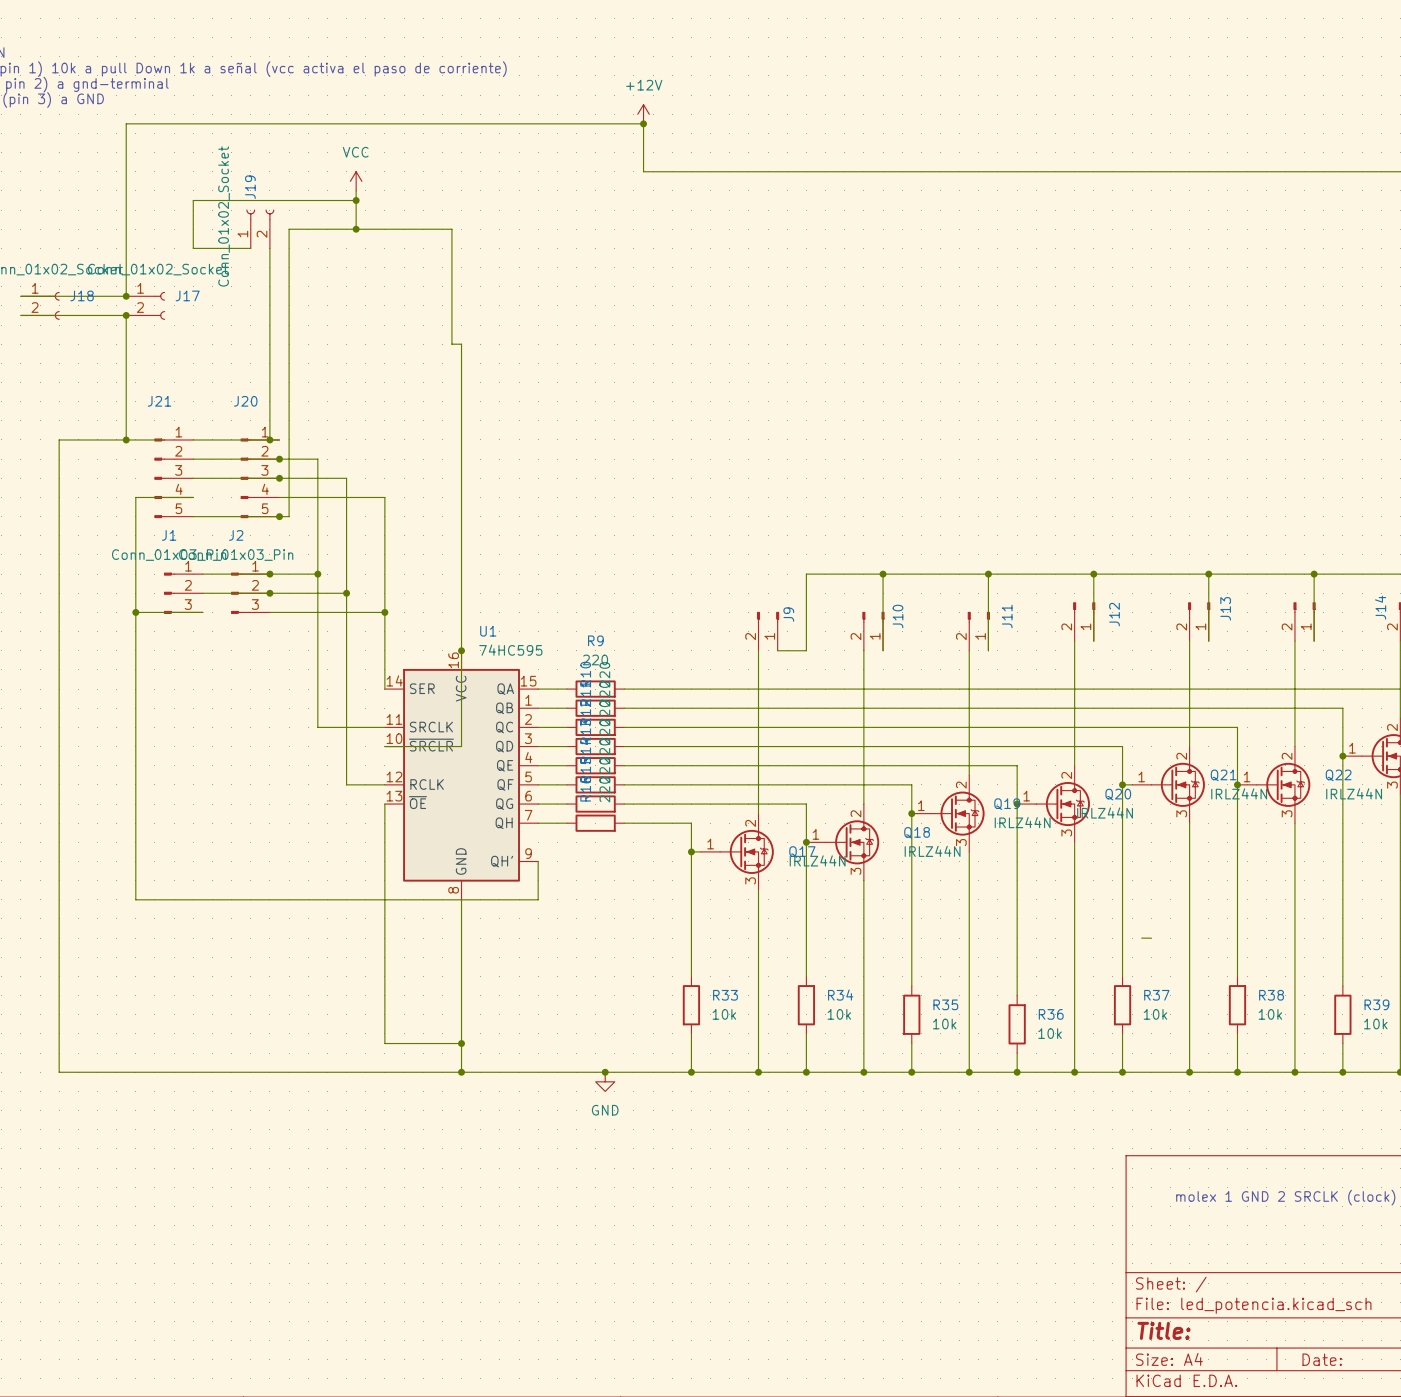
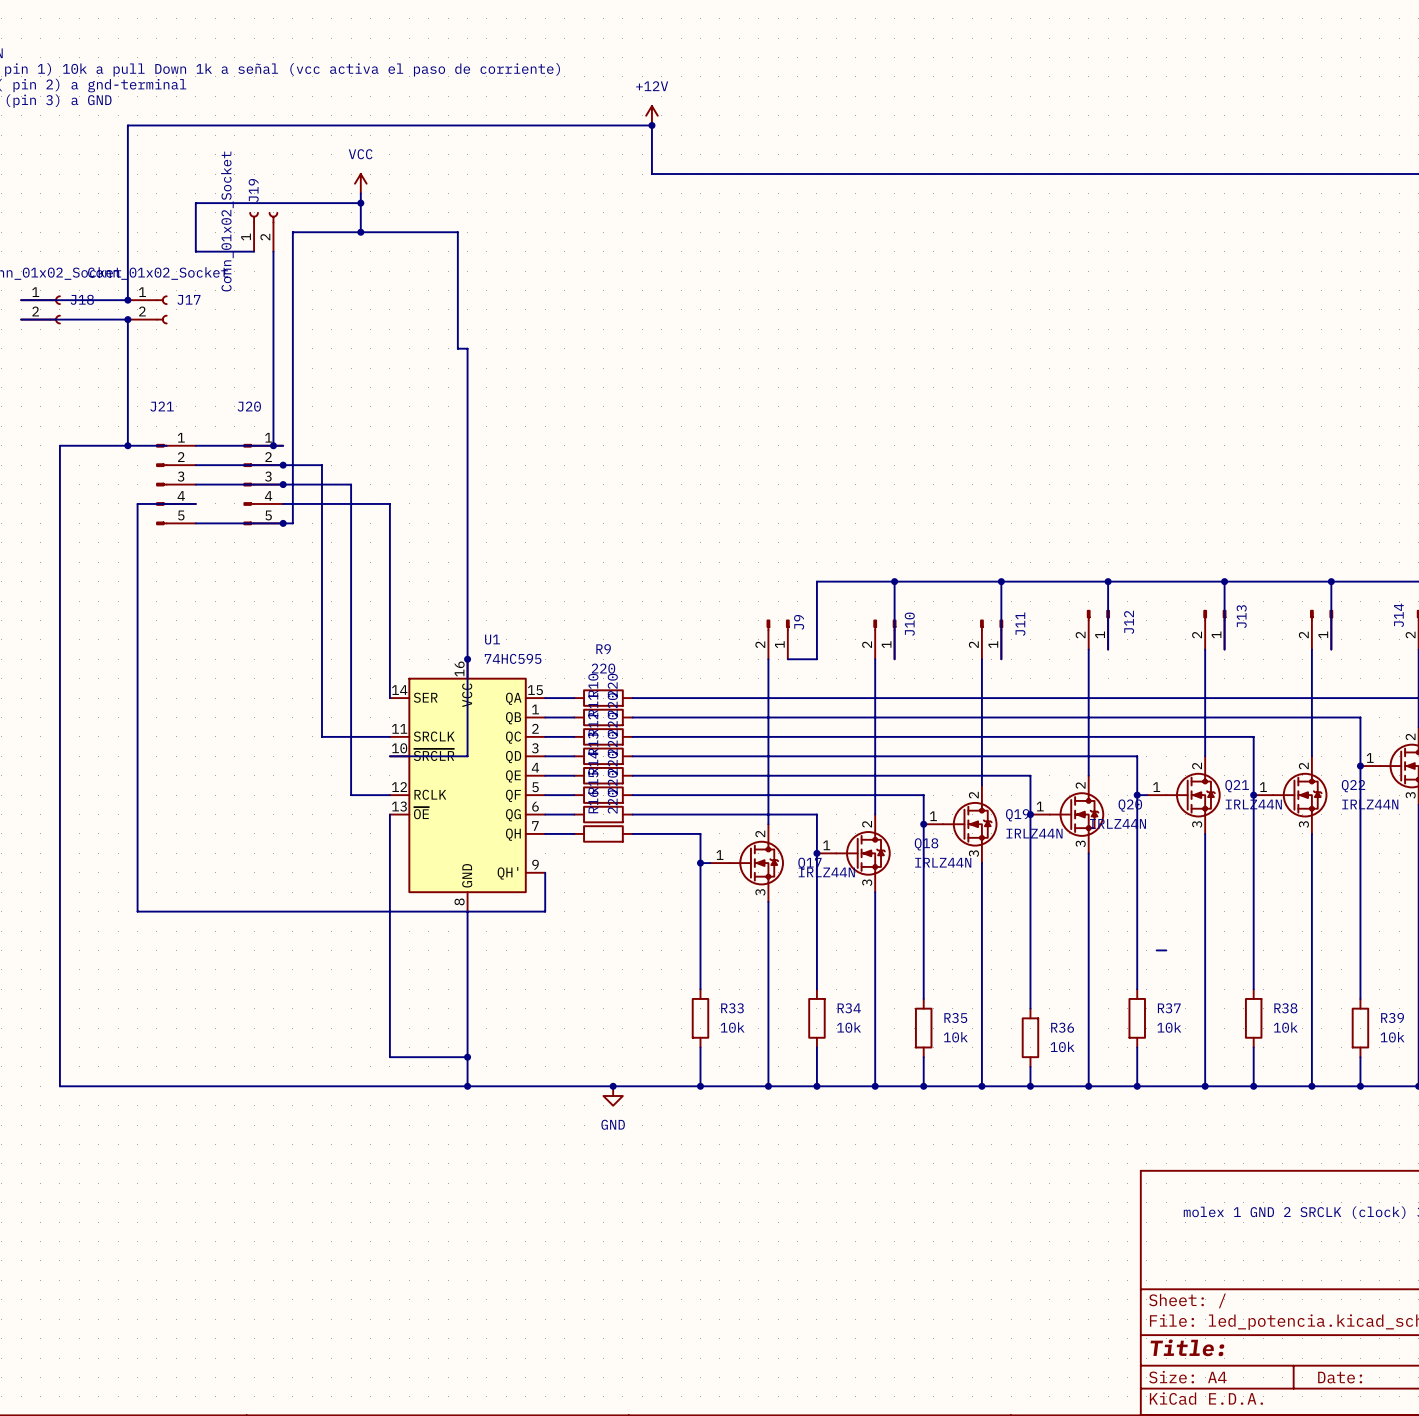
wire: (202, 574) (317, 574) -> none
junction: (269, 574) -> none
junction: (317, 574) -> none
J1: Conn_01x03_Pin (183, 593) -> none
wire: (202, 593) (346, 593) -> none
J2: Conn_01x03_Pin (250, 593) -> none
junction: (269, 593) -> none
junction: (346, 593) -> none
wire: (135, 612) (202, 612) -> none
junction: (135, 612) -> none
wire: (269, 612) (384, 612) -> none
junction: (384, 612) -> none

